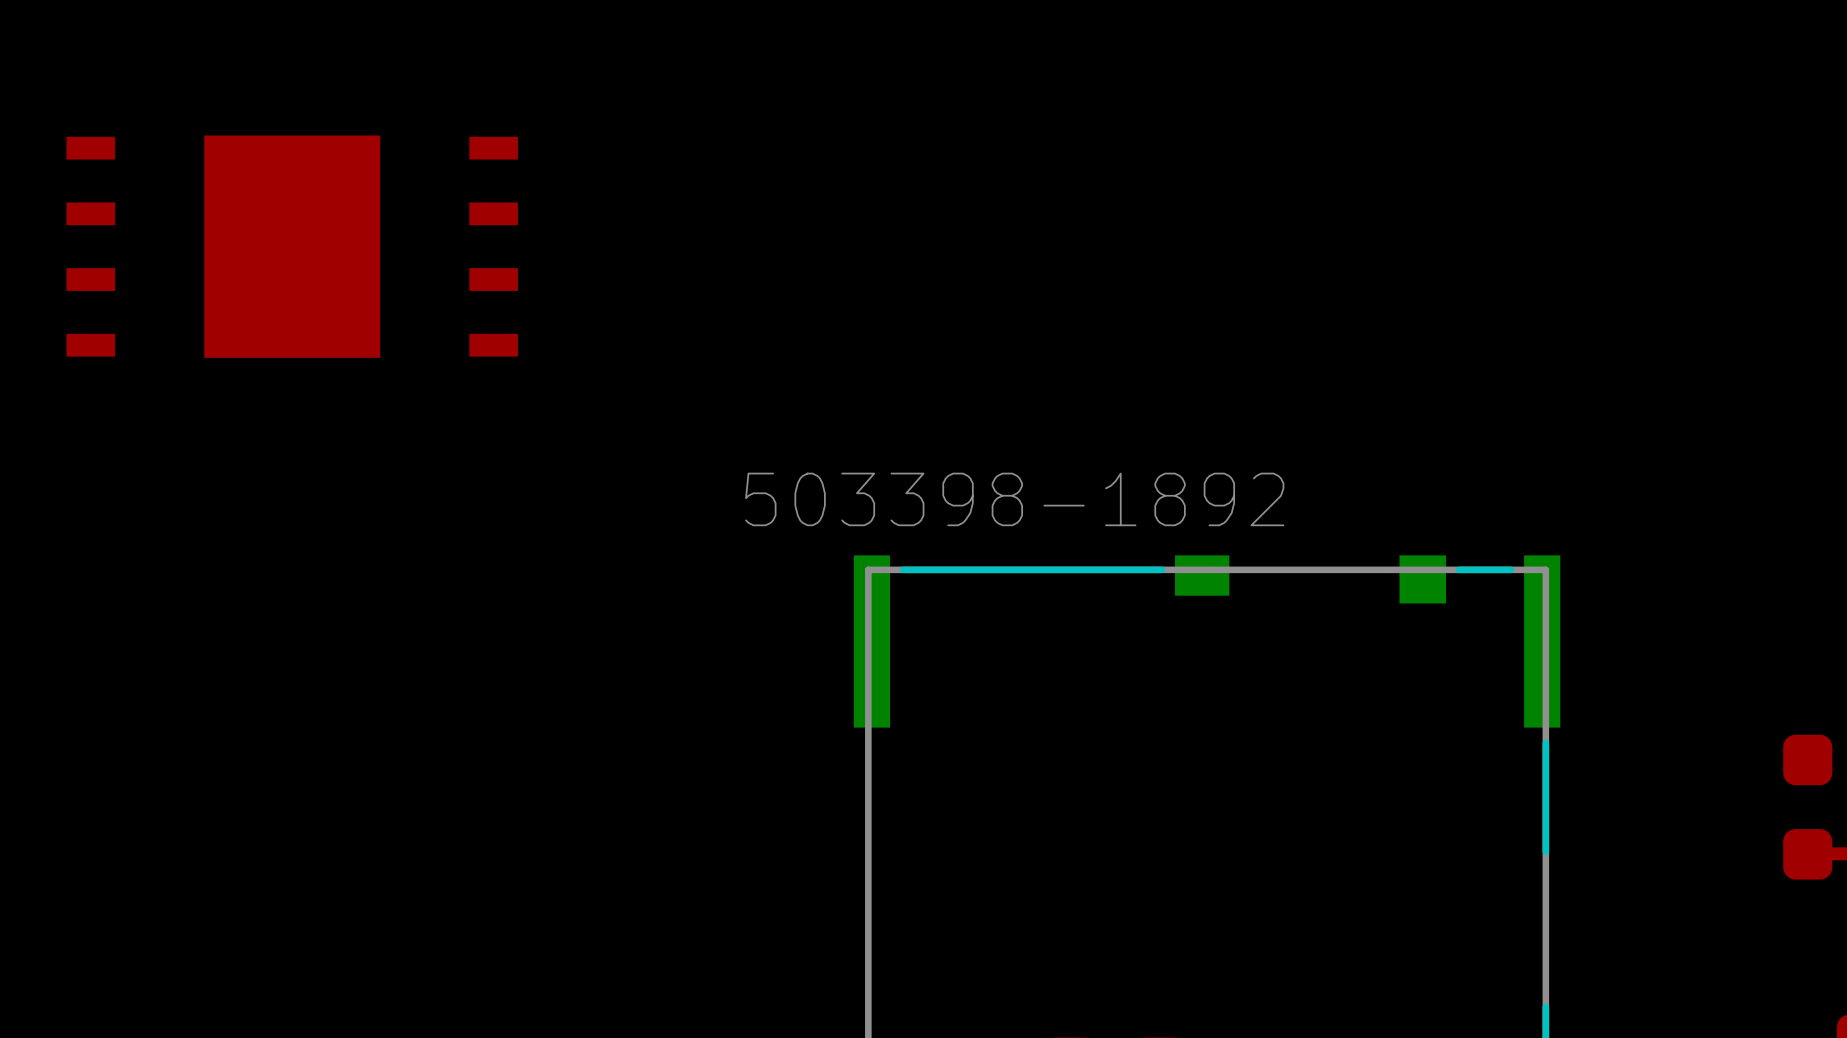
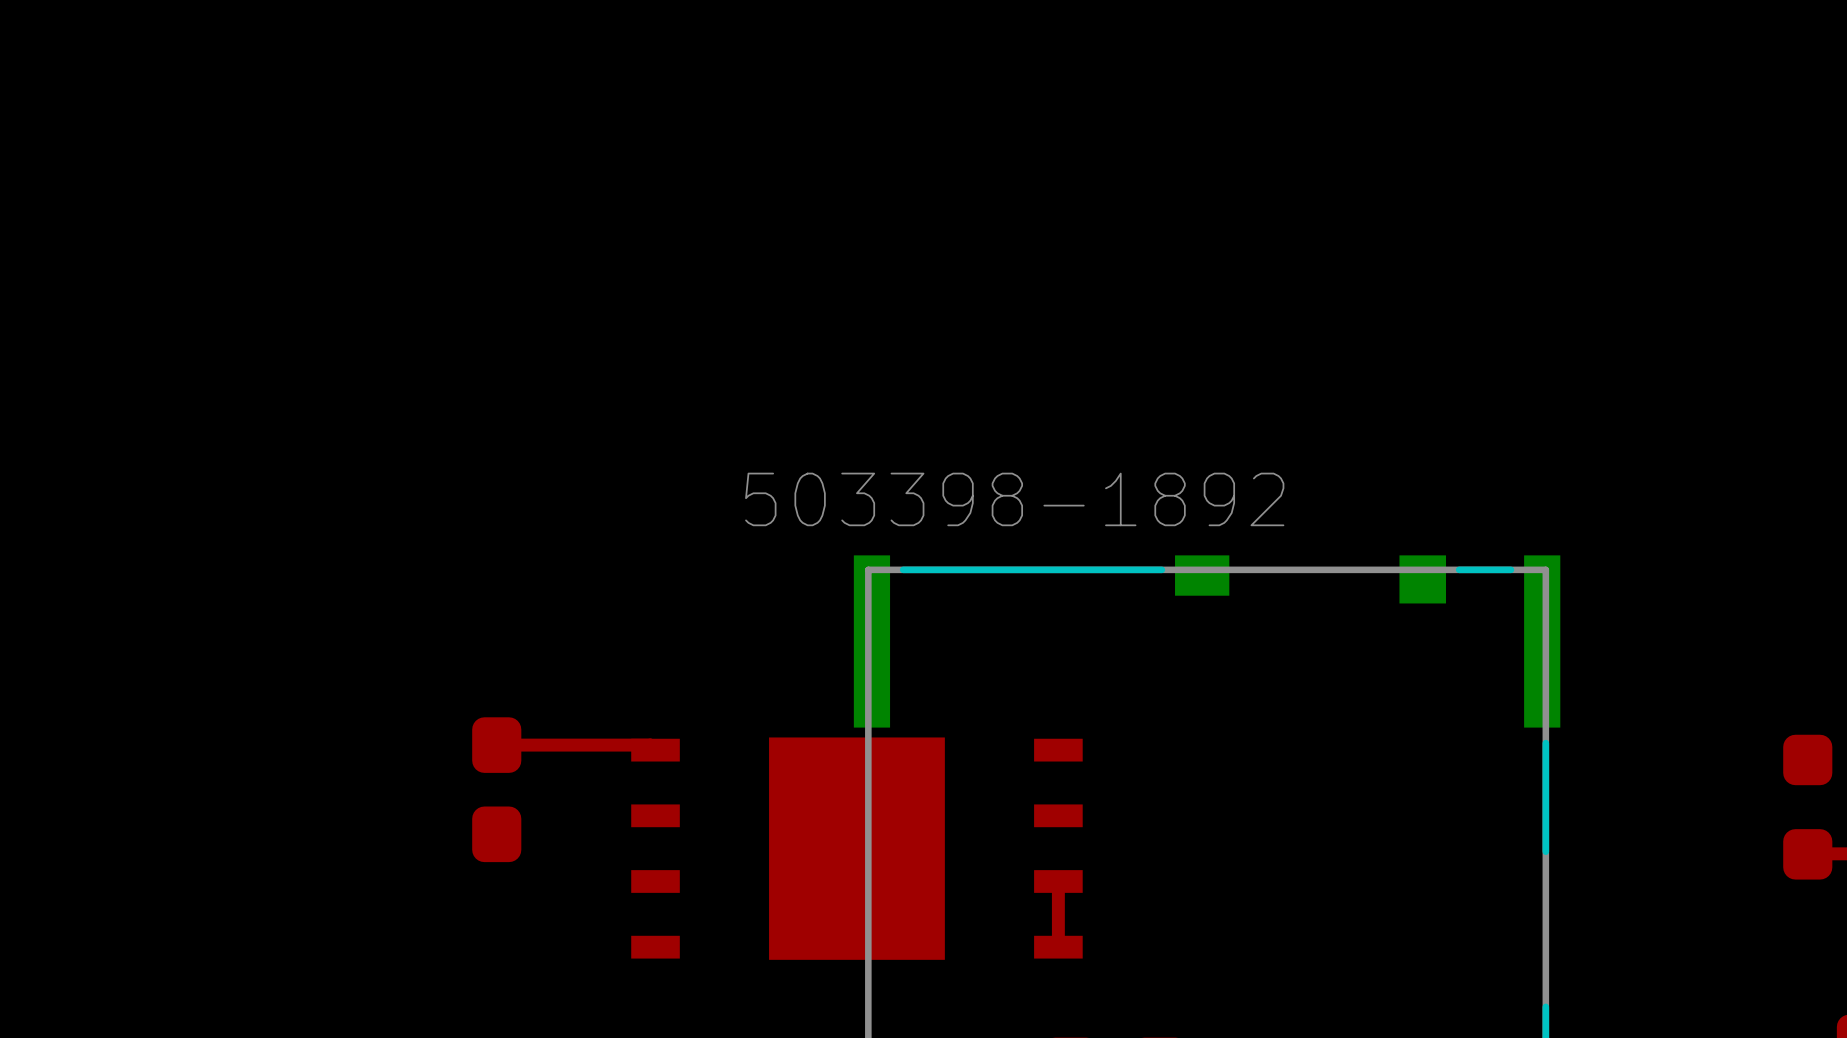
part position: (292, 246) -> (856, 848)
top track: none -> (496, 745) (650, 745) (655, 750)
part: none -> (496, 789)
top track: none -> (1058, 881) (1058, 947)

